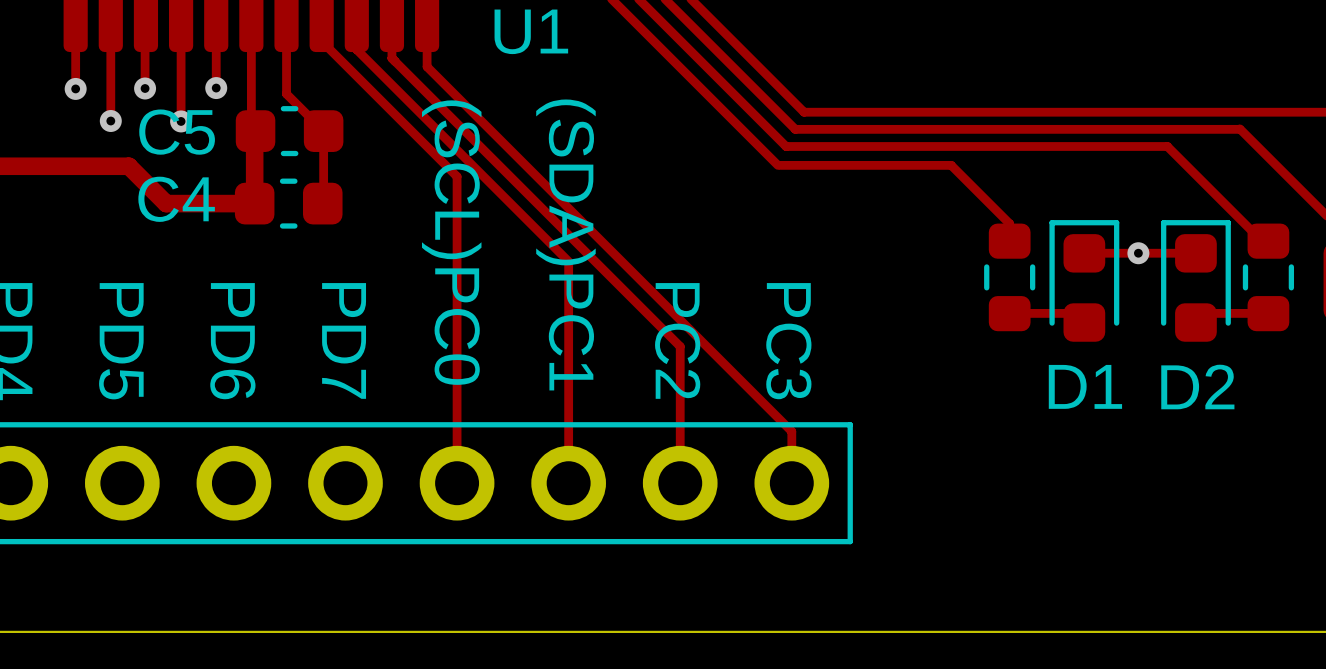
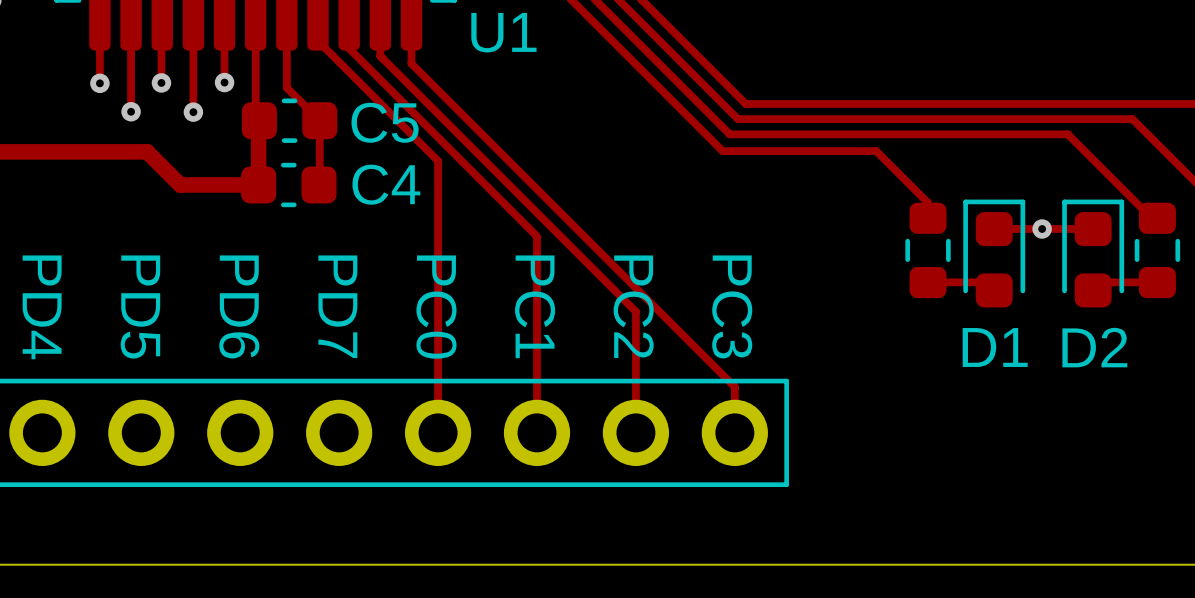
C5 name position: C5 (177, 132) -> C5 (385, 122)
C4 name position: C4 (176, 199) -> C4 (386, 184)
text: (SCL)PC0 (451, 242) -> none
text: (SDA)PC1 (565, 244) -> none
text: none -> PC0 (436, 307)
text: none -> PC1 (535, 306)

